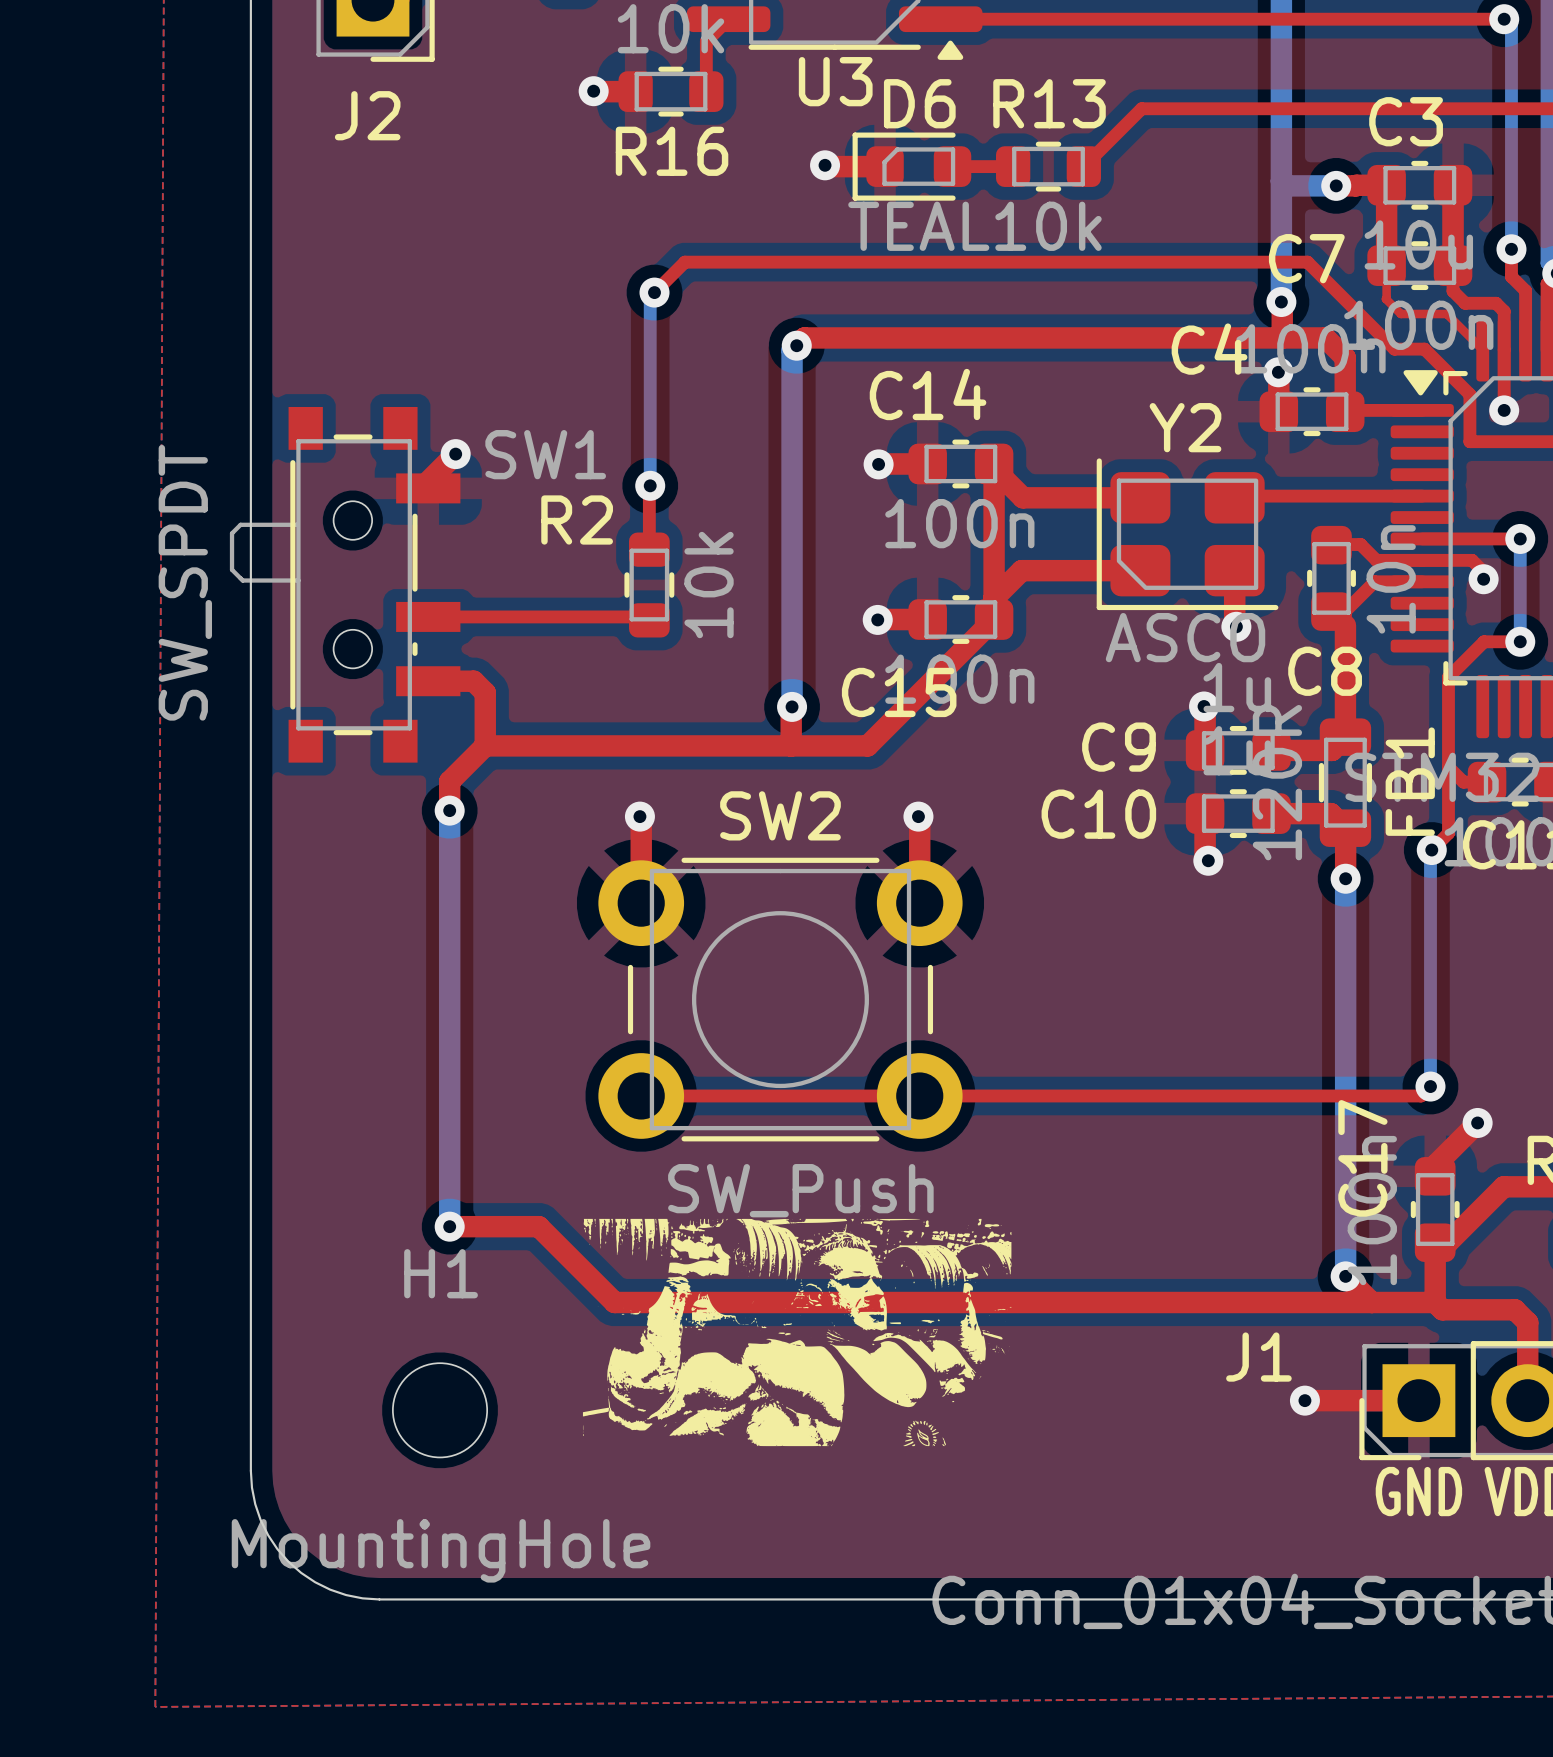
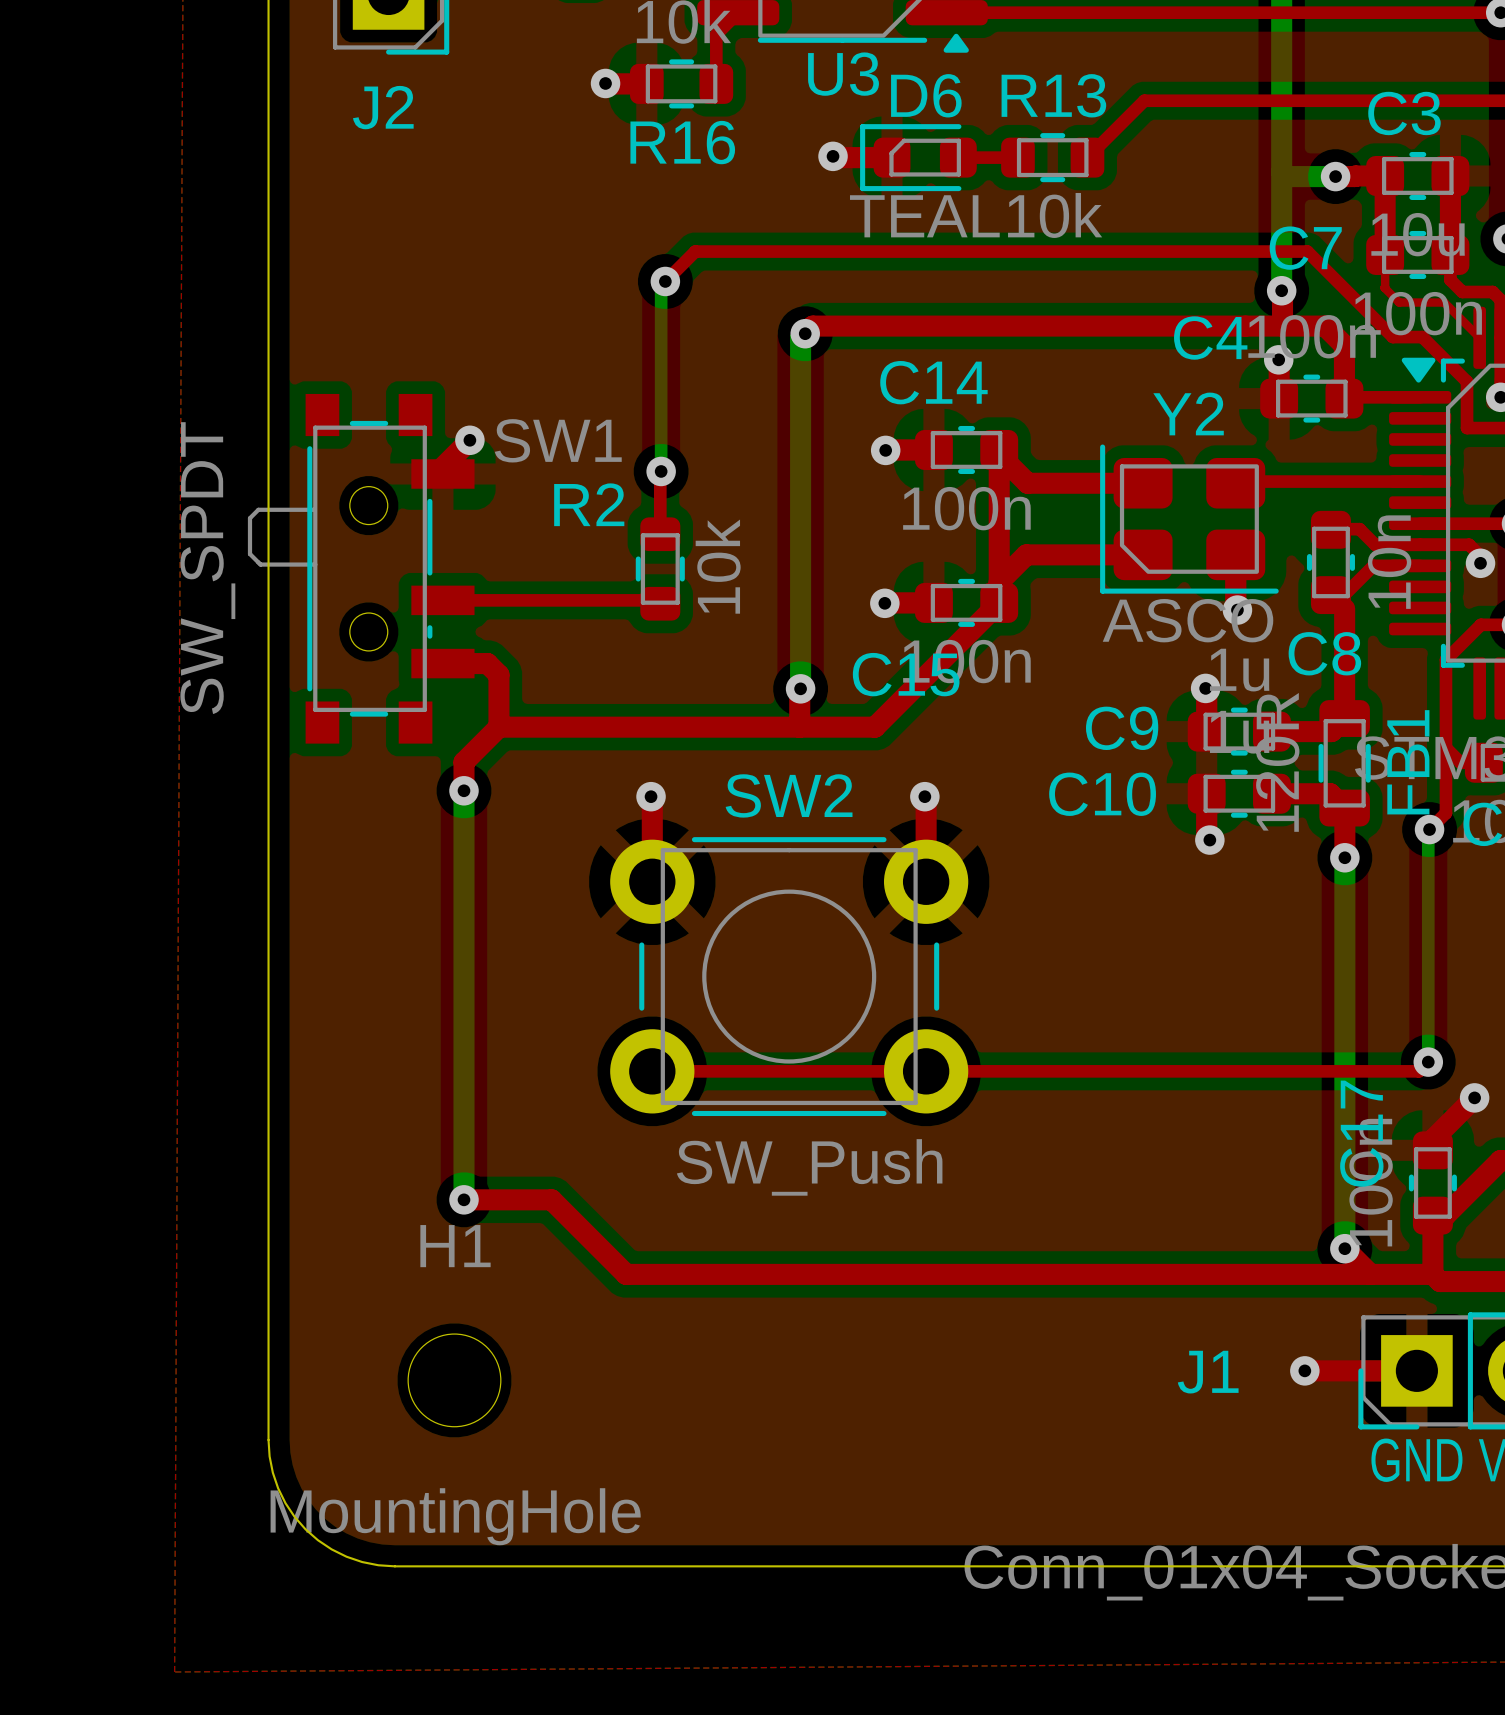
drawing: [582, 1218, 1012, 1447] -> none
J1 name position: J1 (1258, 1357) -> J1 (1208, 1372)

